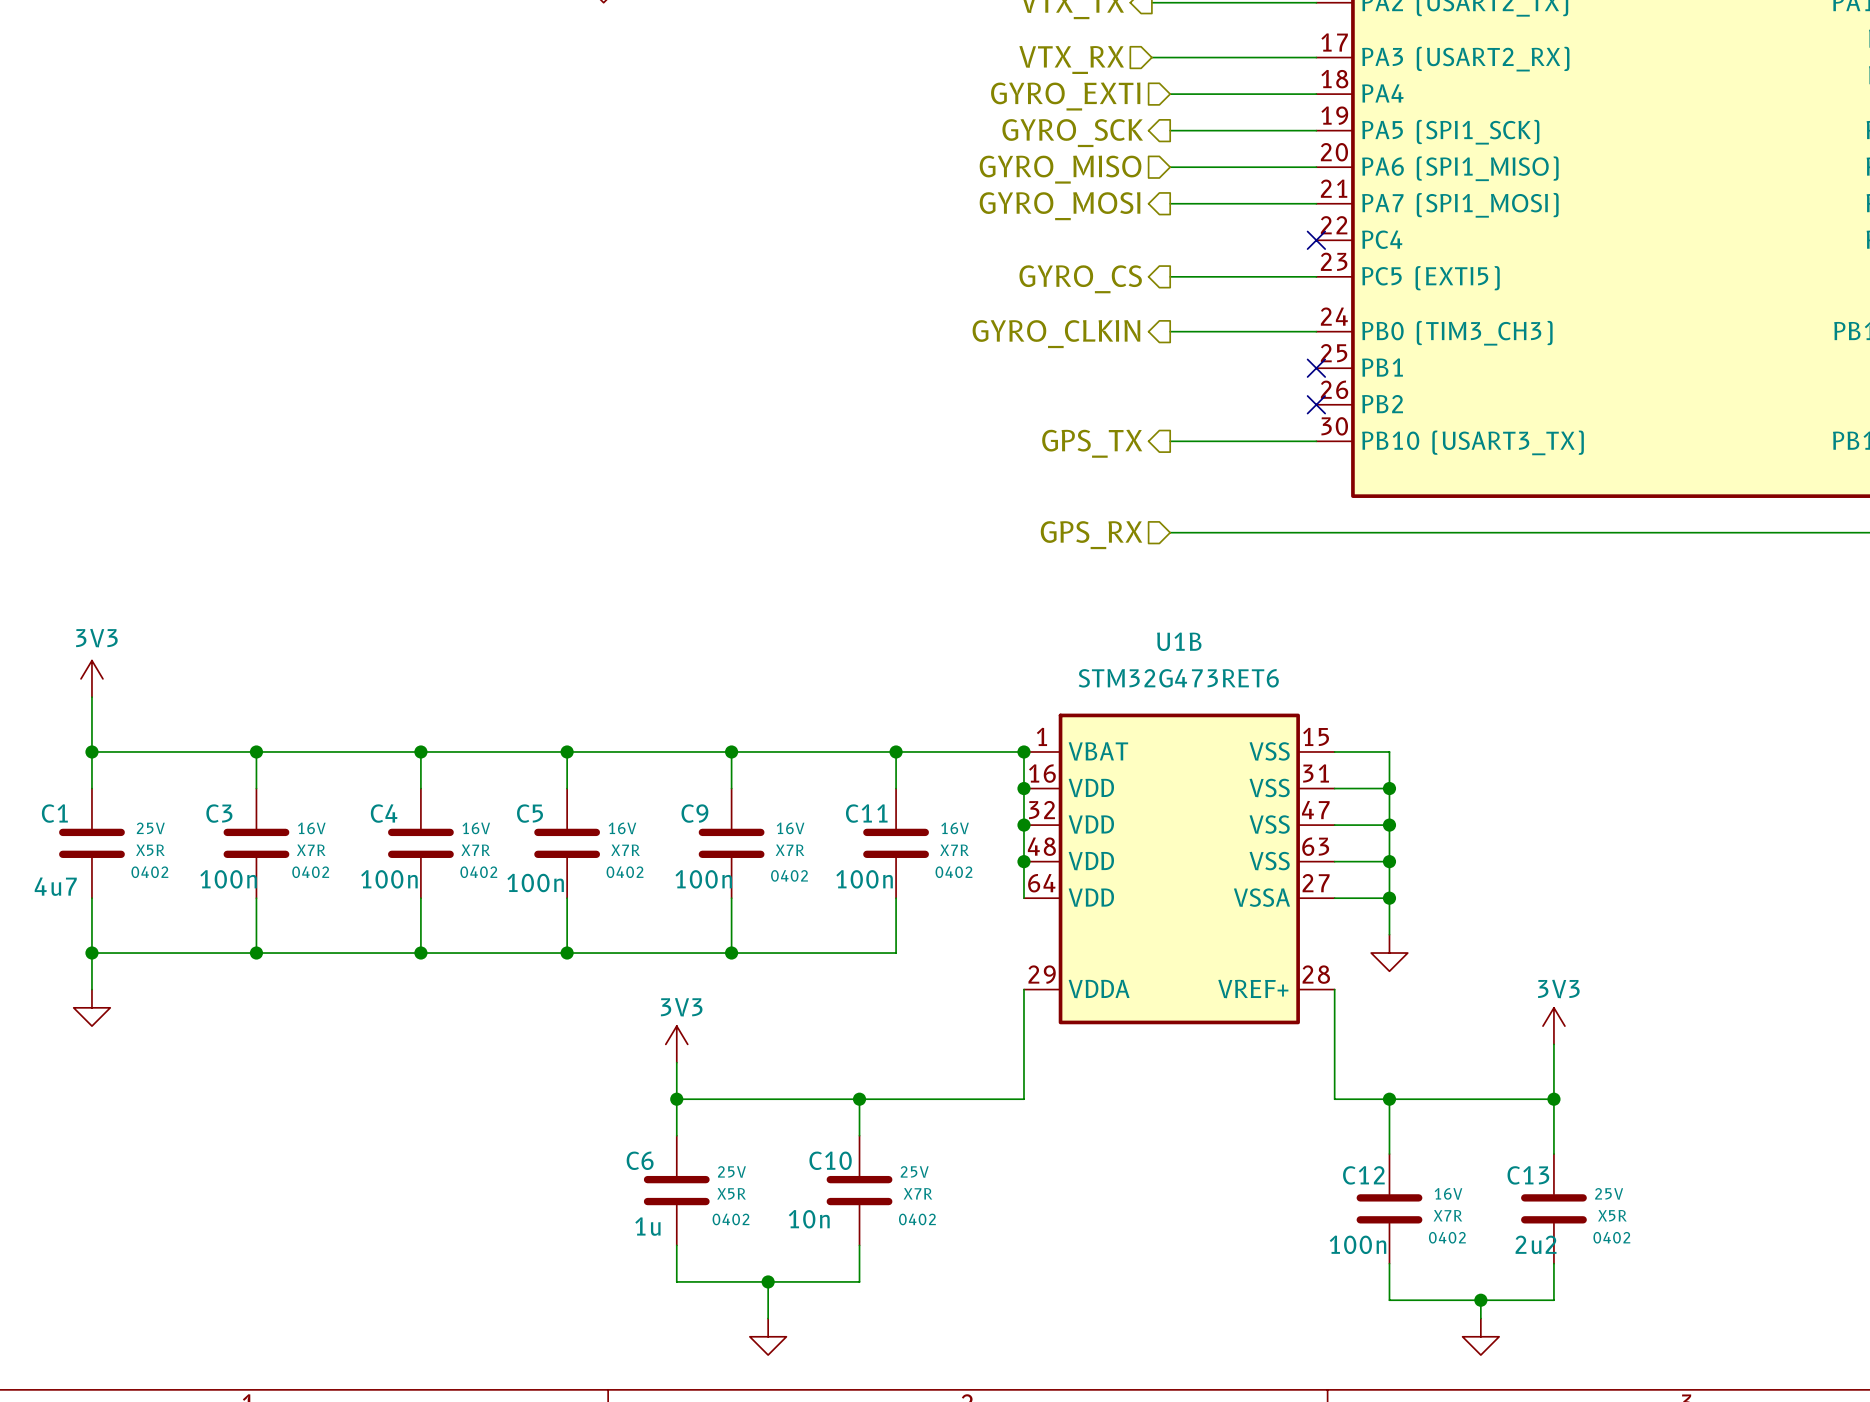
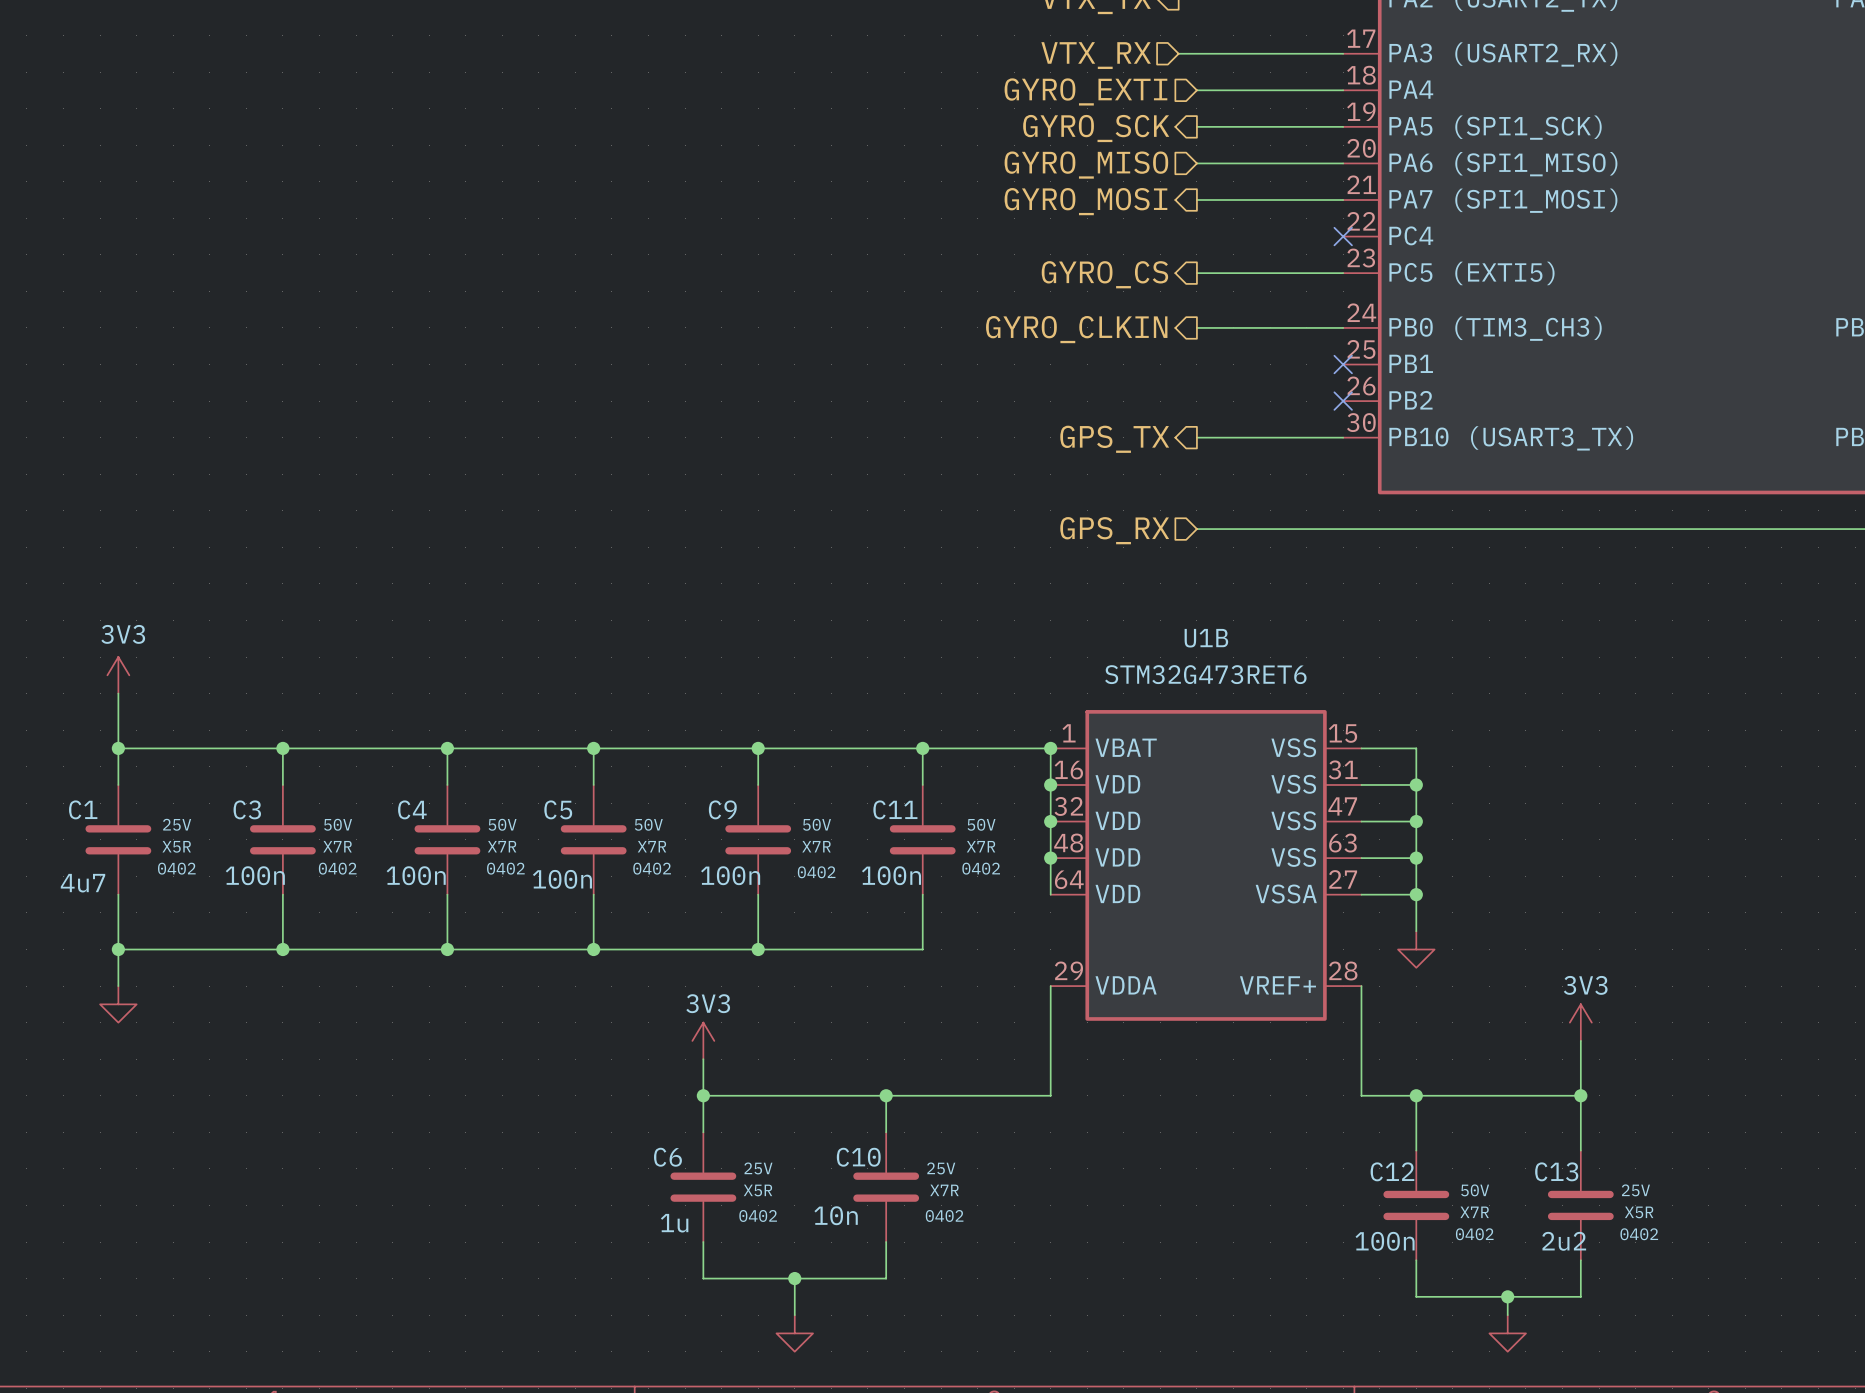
C3 text: 16V (311, 828) -> 50V (338, 824)
C4 text: 16V (476, 828) -> 50V (502, 824)
C5 text: 16V (622, 828) -> 50V (648, 824)
C9 text: 16V (790, 828) -> 50V (817, 824)
C11 text: 16V (955, 828) -> 50V (981, 824)
C12 text: 16V (1448, 1193) -> 50V (1475, 1190)

